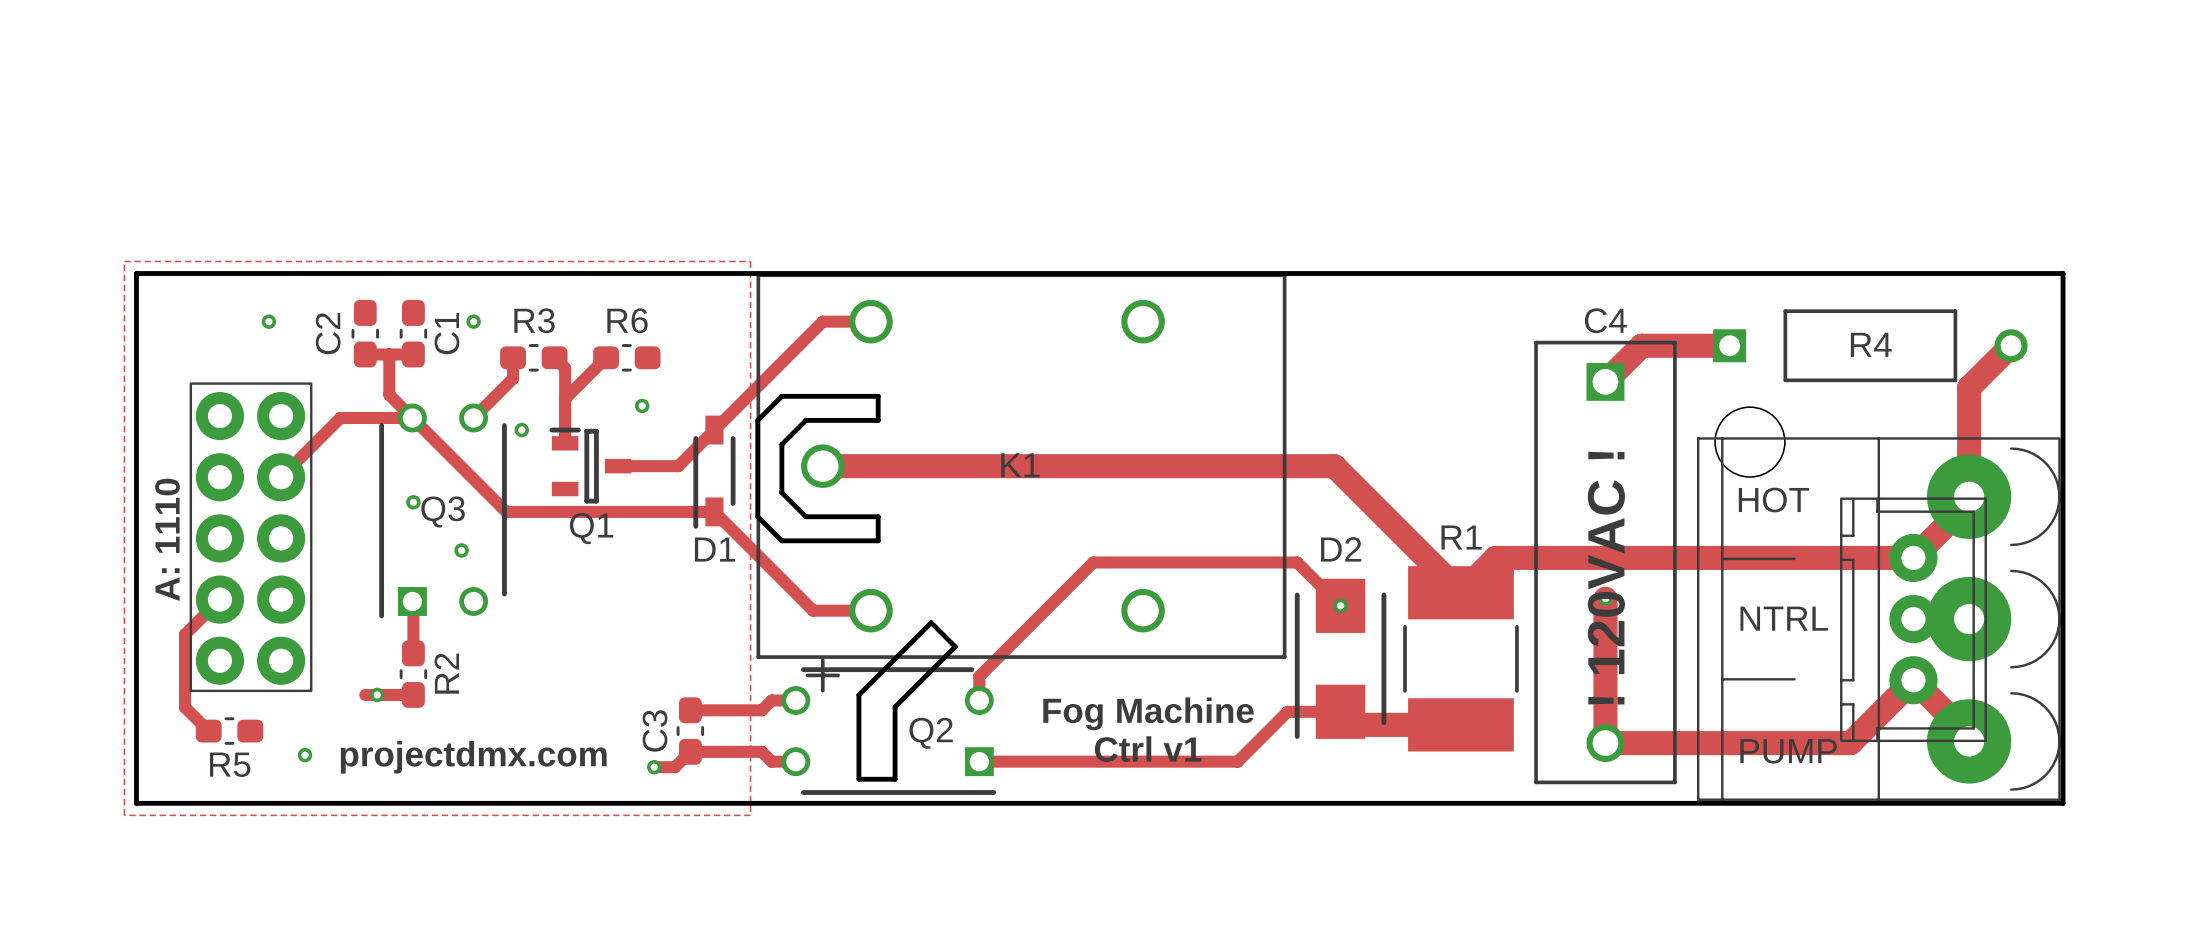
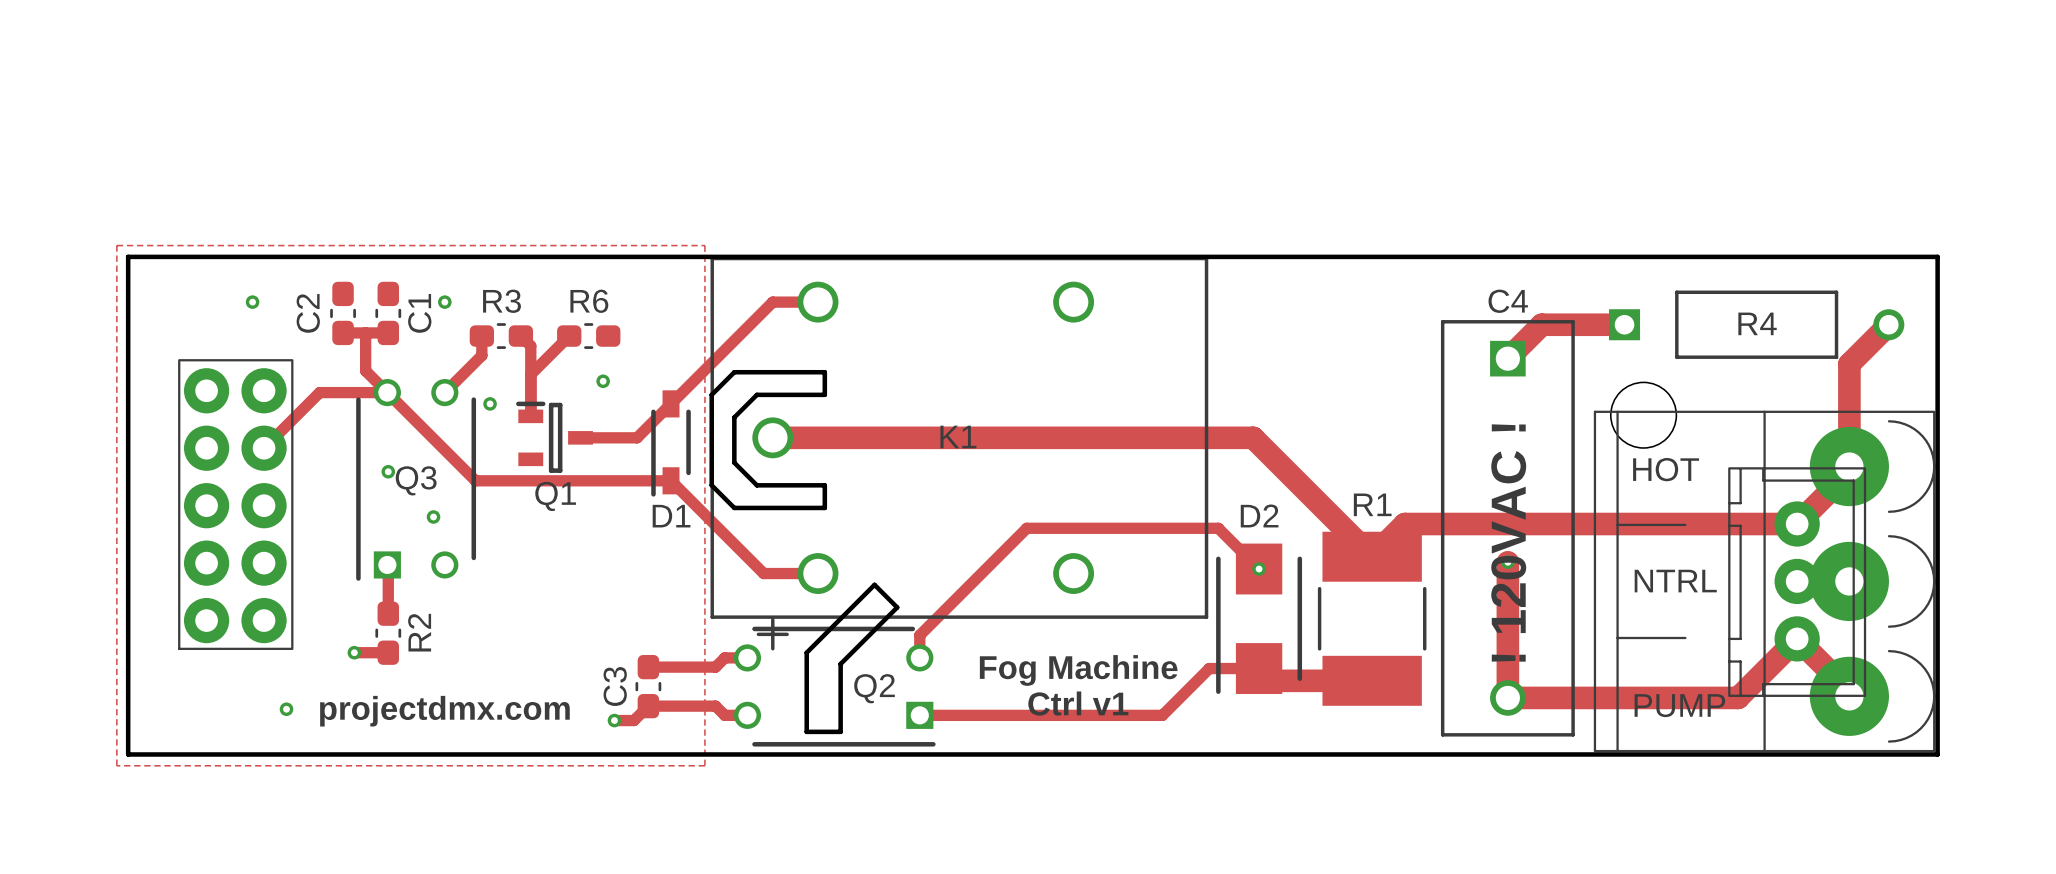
text: A: 1110 (167, 539) -> none
track: (219, 599) (185, 634) (185, 707) (208, 731) -> none
track: (365, 694) (377, 694) -> none
R5: (229, 731) -> none

